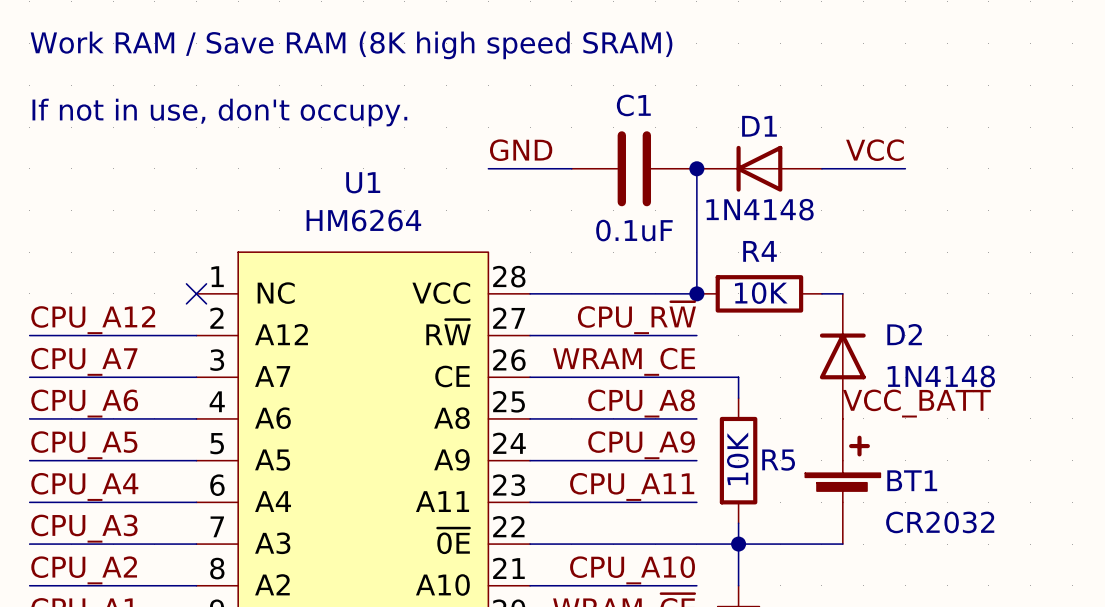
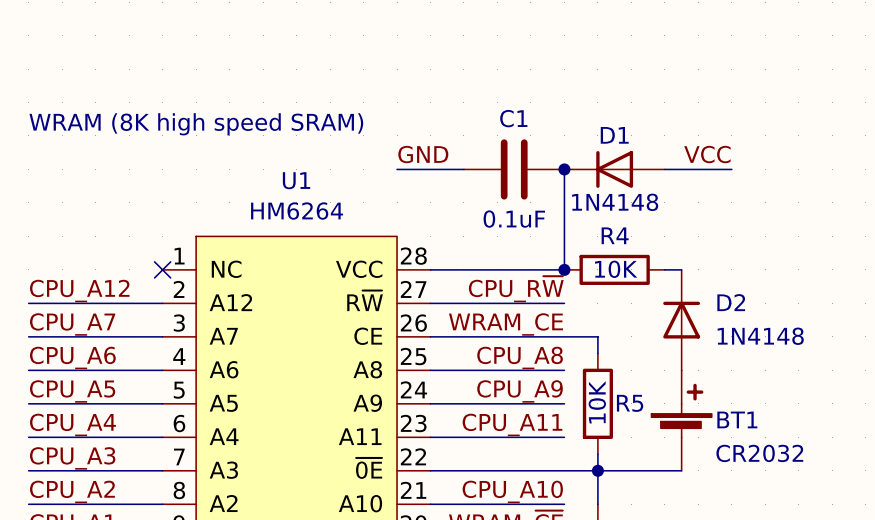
text: Work RAM / Save RAM (8K high speed SRAM) (351, 45) -> none
text: If not in use, don't occupy. (219, 112) -> WRAM (8K high speed SRAM) (196, 124)
label: VCC_BATT (916, 403) -> none

